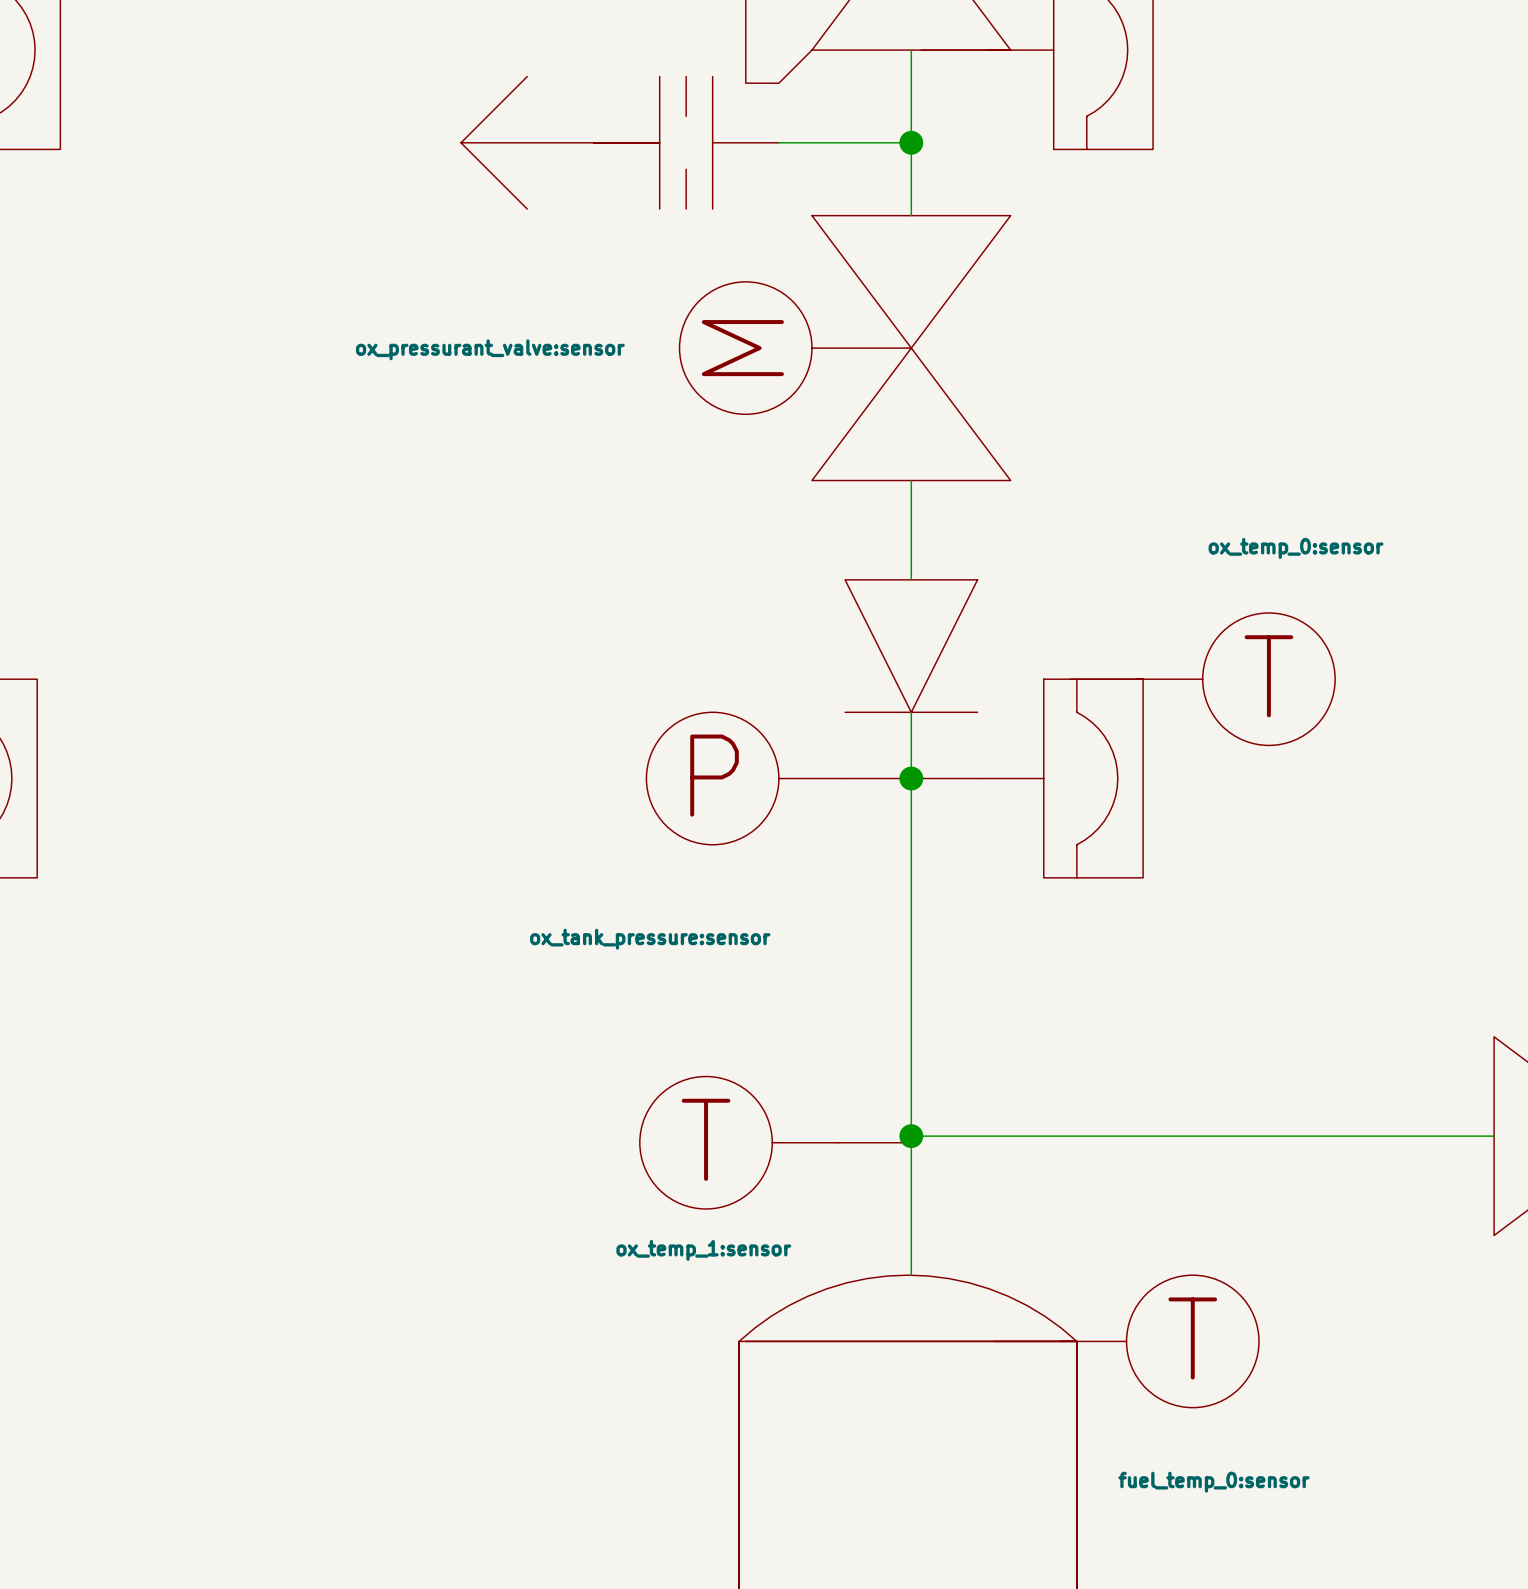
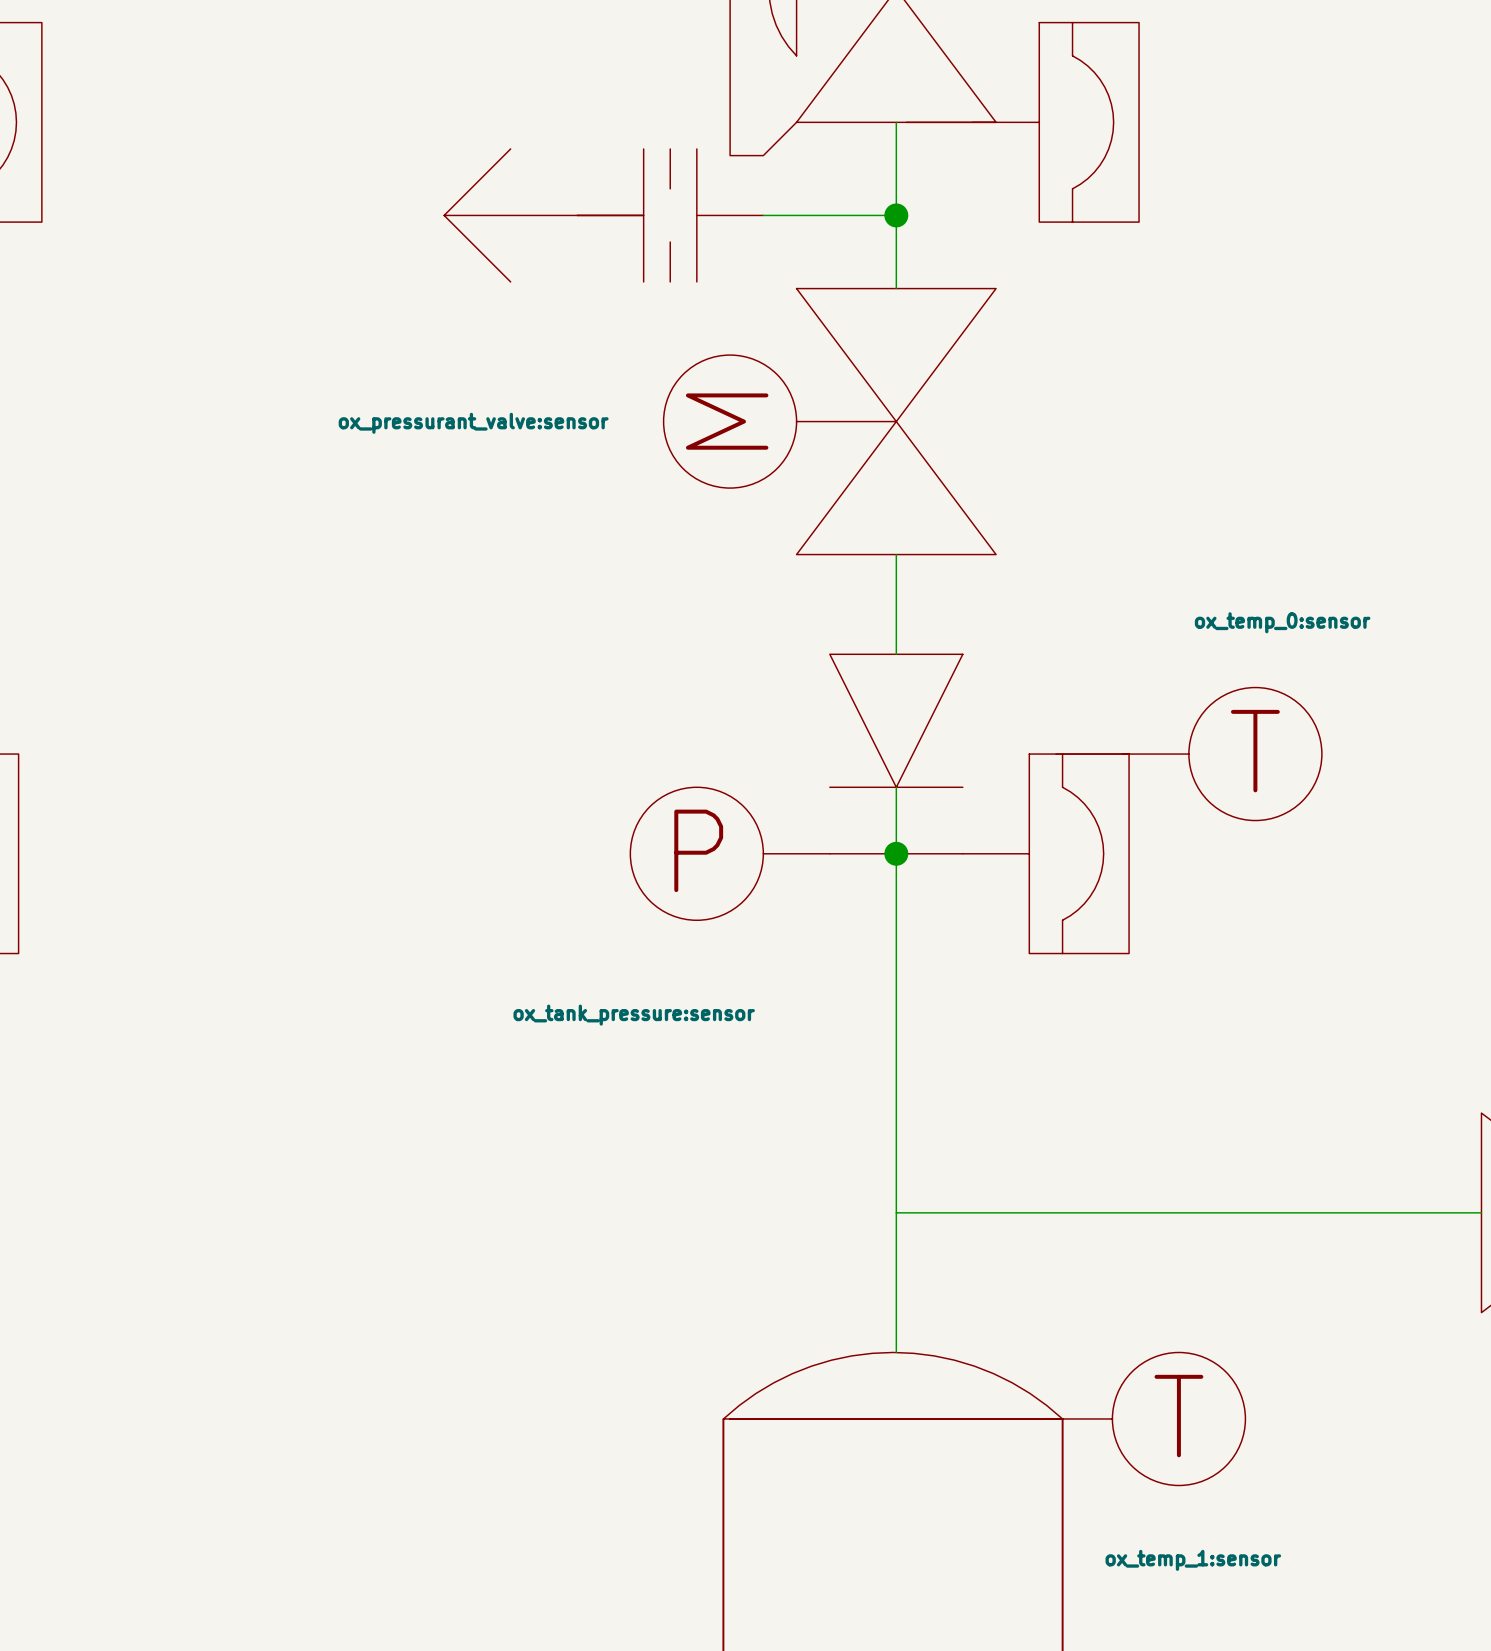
junction: (911, 1136) -> none
part: ox_temp_1:sensor (772, 1142) -> none
part value: fuel_temp_0:sensor (1214, 1482) -> ox_temp_1:sensor (1193, 1560)

